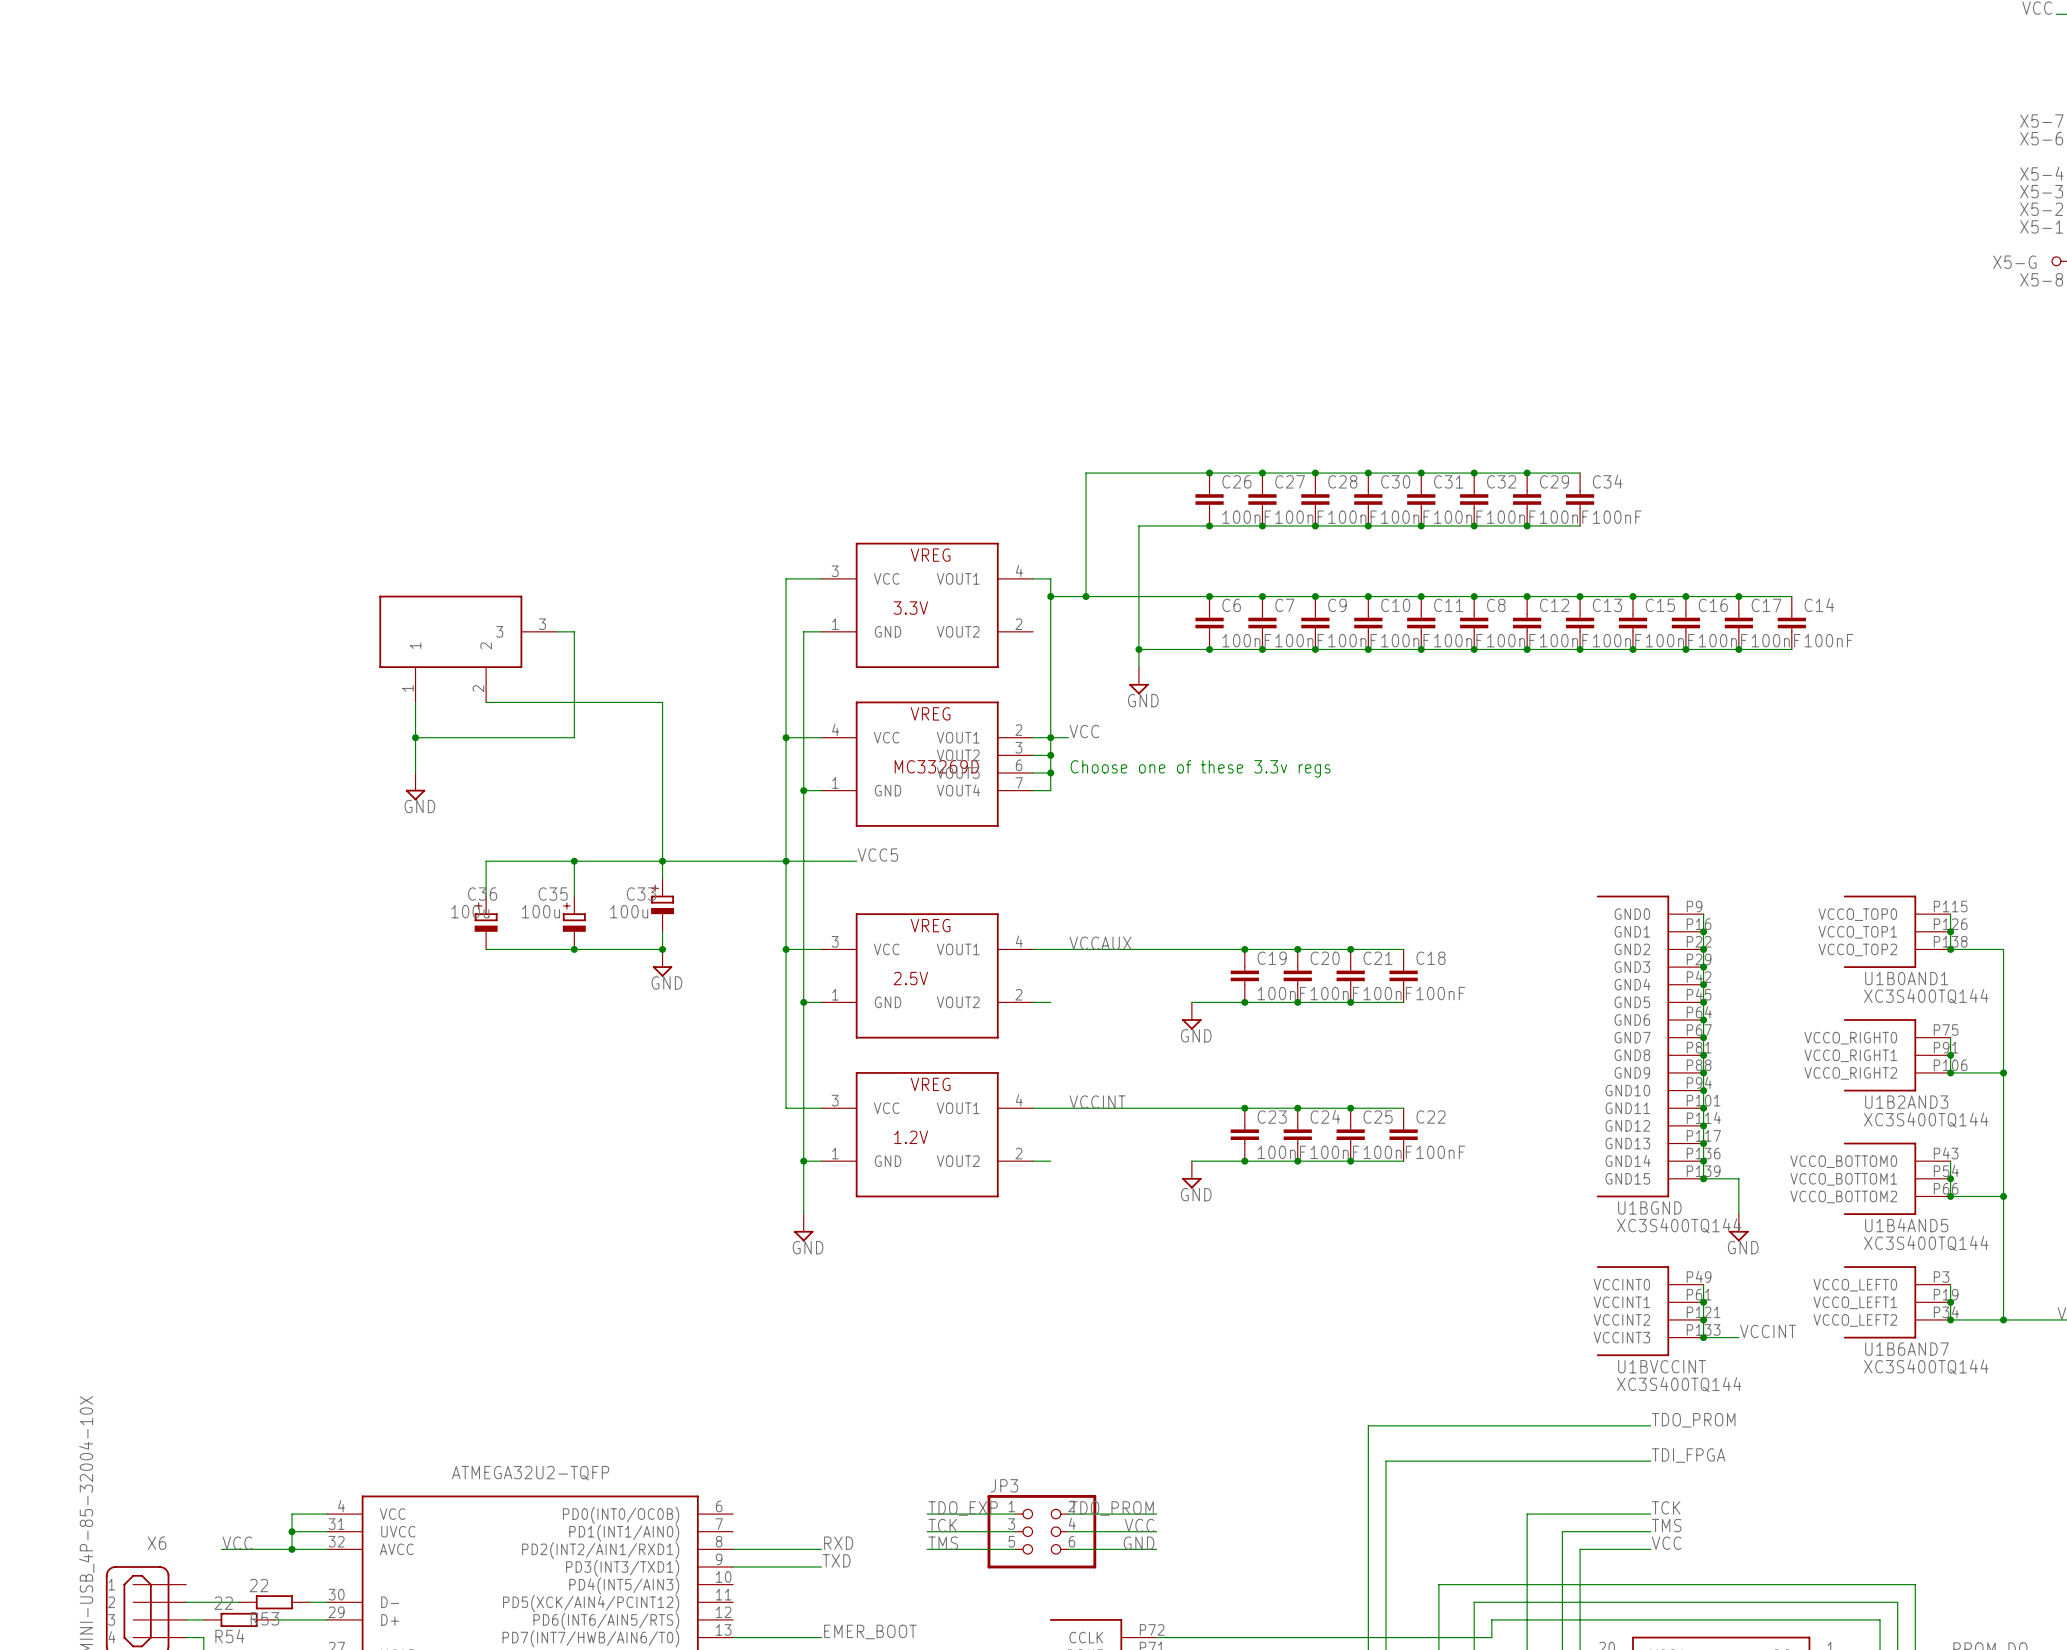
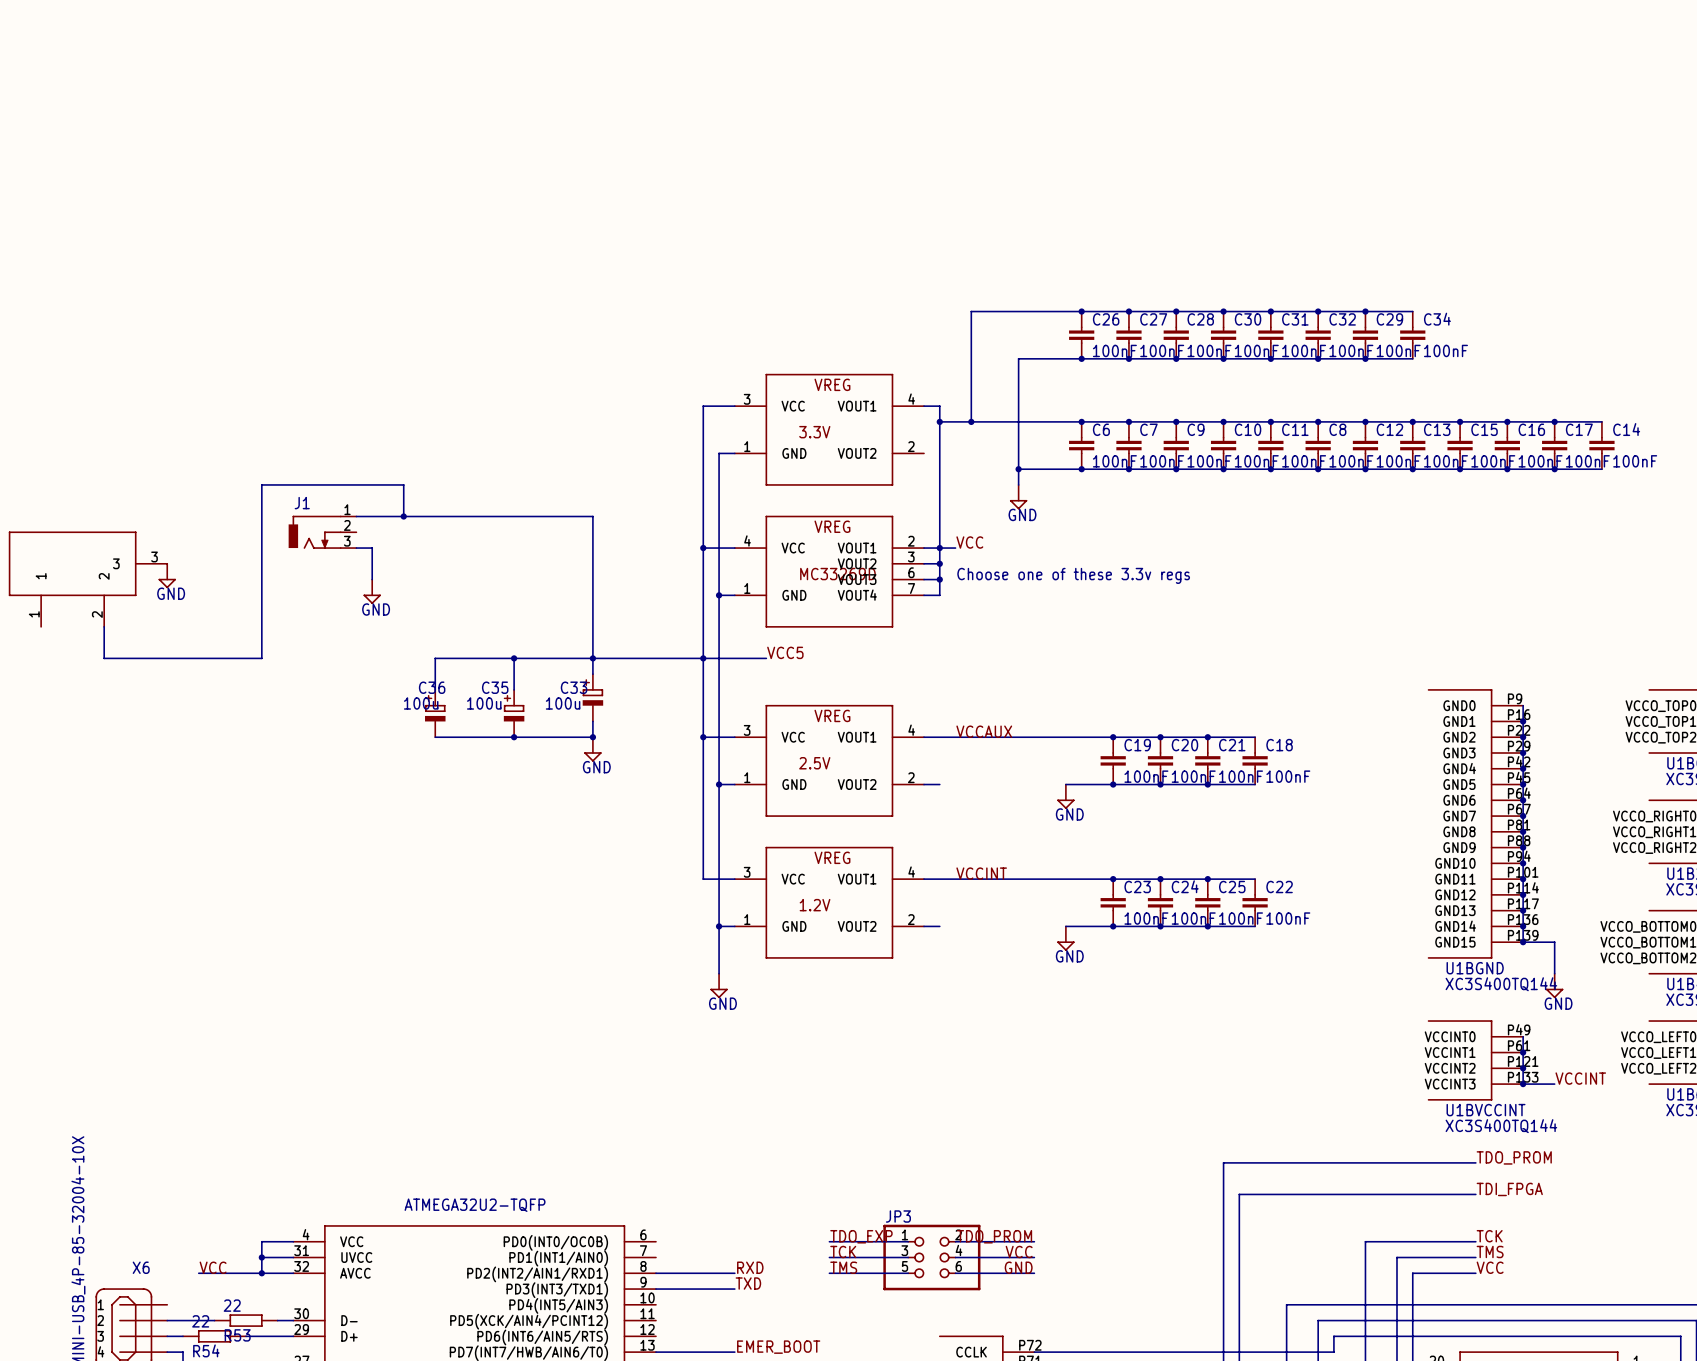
wire: (556, 631) (574, 631) (574, 737) (415, 737) (415, 702) -> none
part: (468, 649) -> none
wire: none -> (356, 516) (435, 516)
wire: none -> (403, 516) (403, 484) (261, 484) (261, 658) (104, 658) (104, 626)
junction: none -> (403, 516)
J1: none -> (322, 532)
wire: none -> (356, 548) (372, 548)
junction: (415, 737) -> none
power symbol: none -> GND (167, 576)
part: none -> (88, 579)

